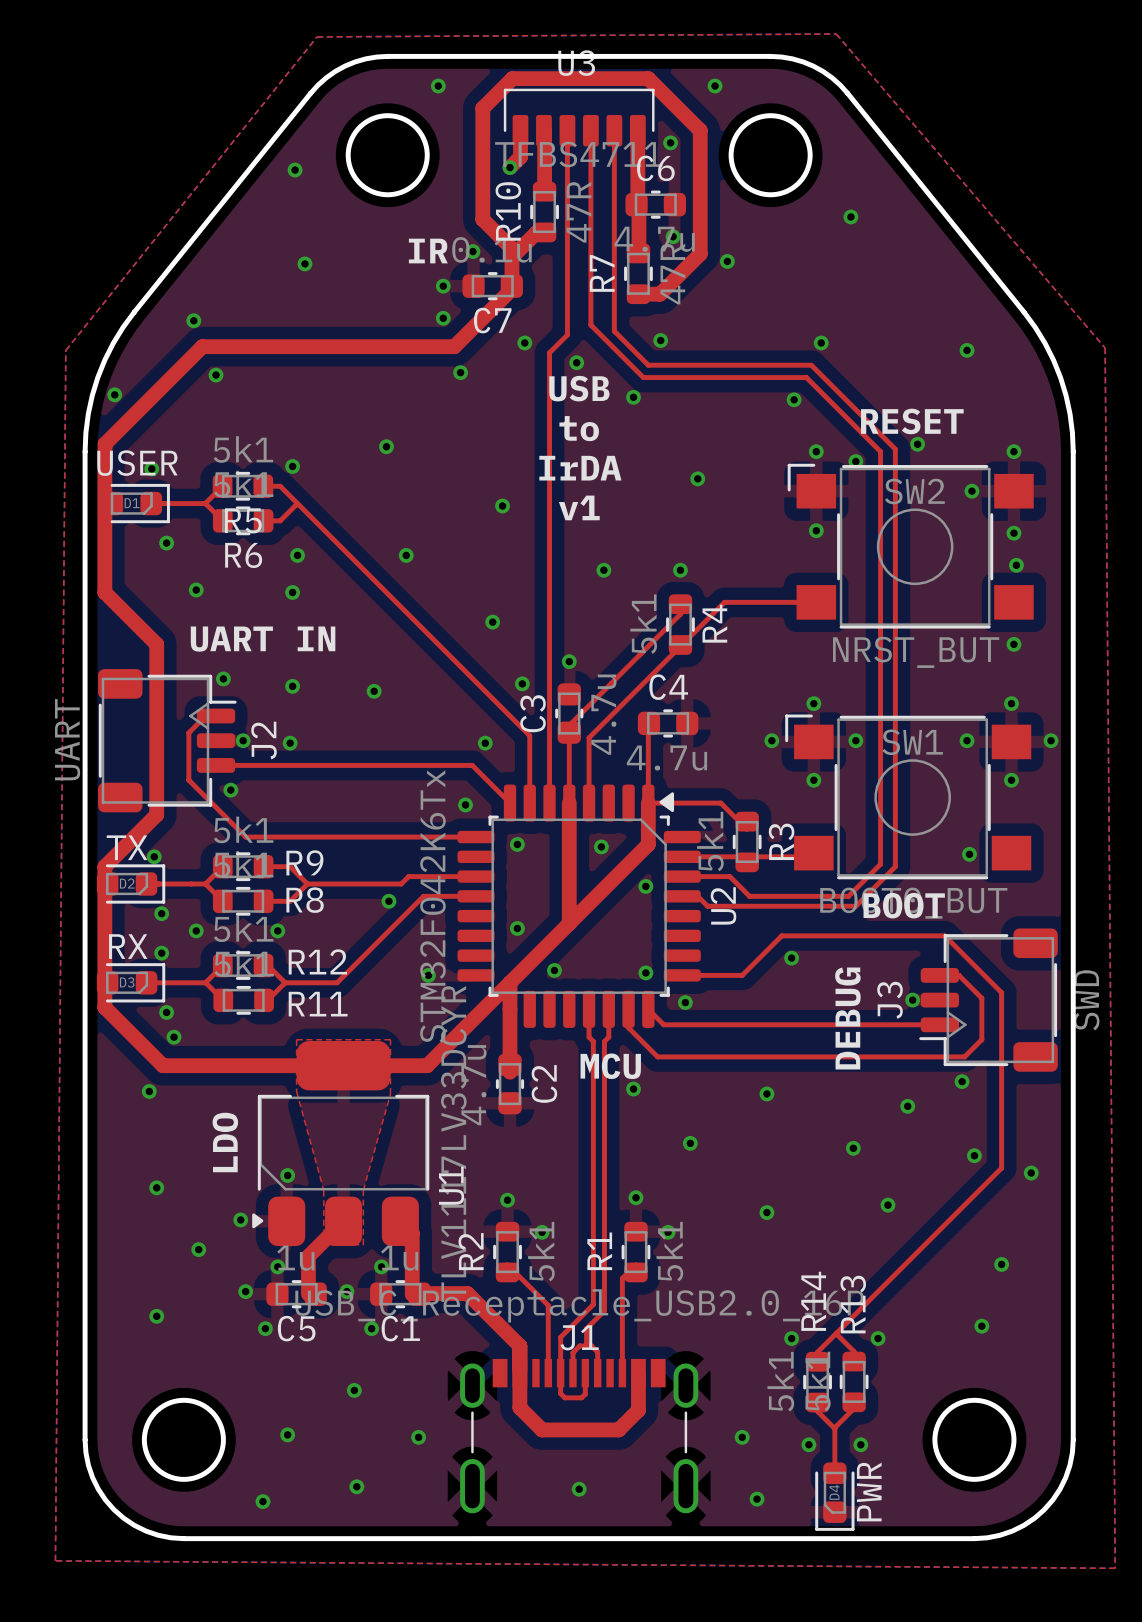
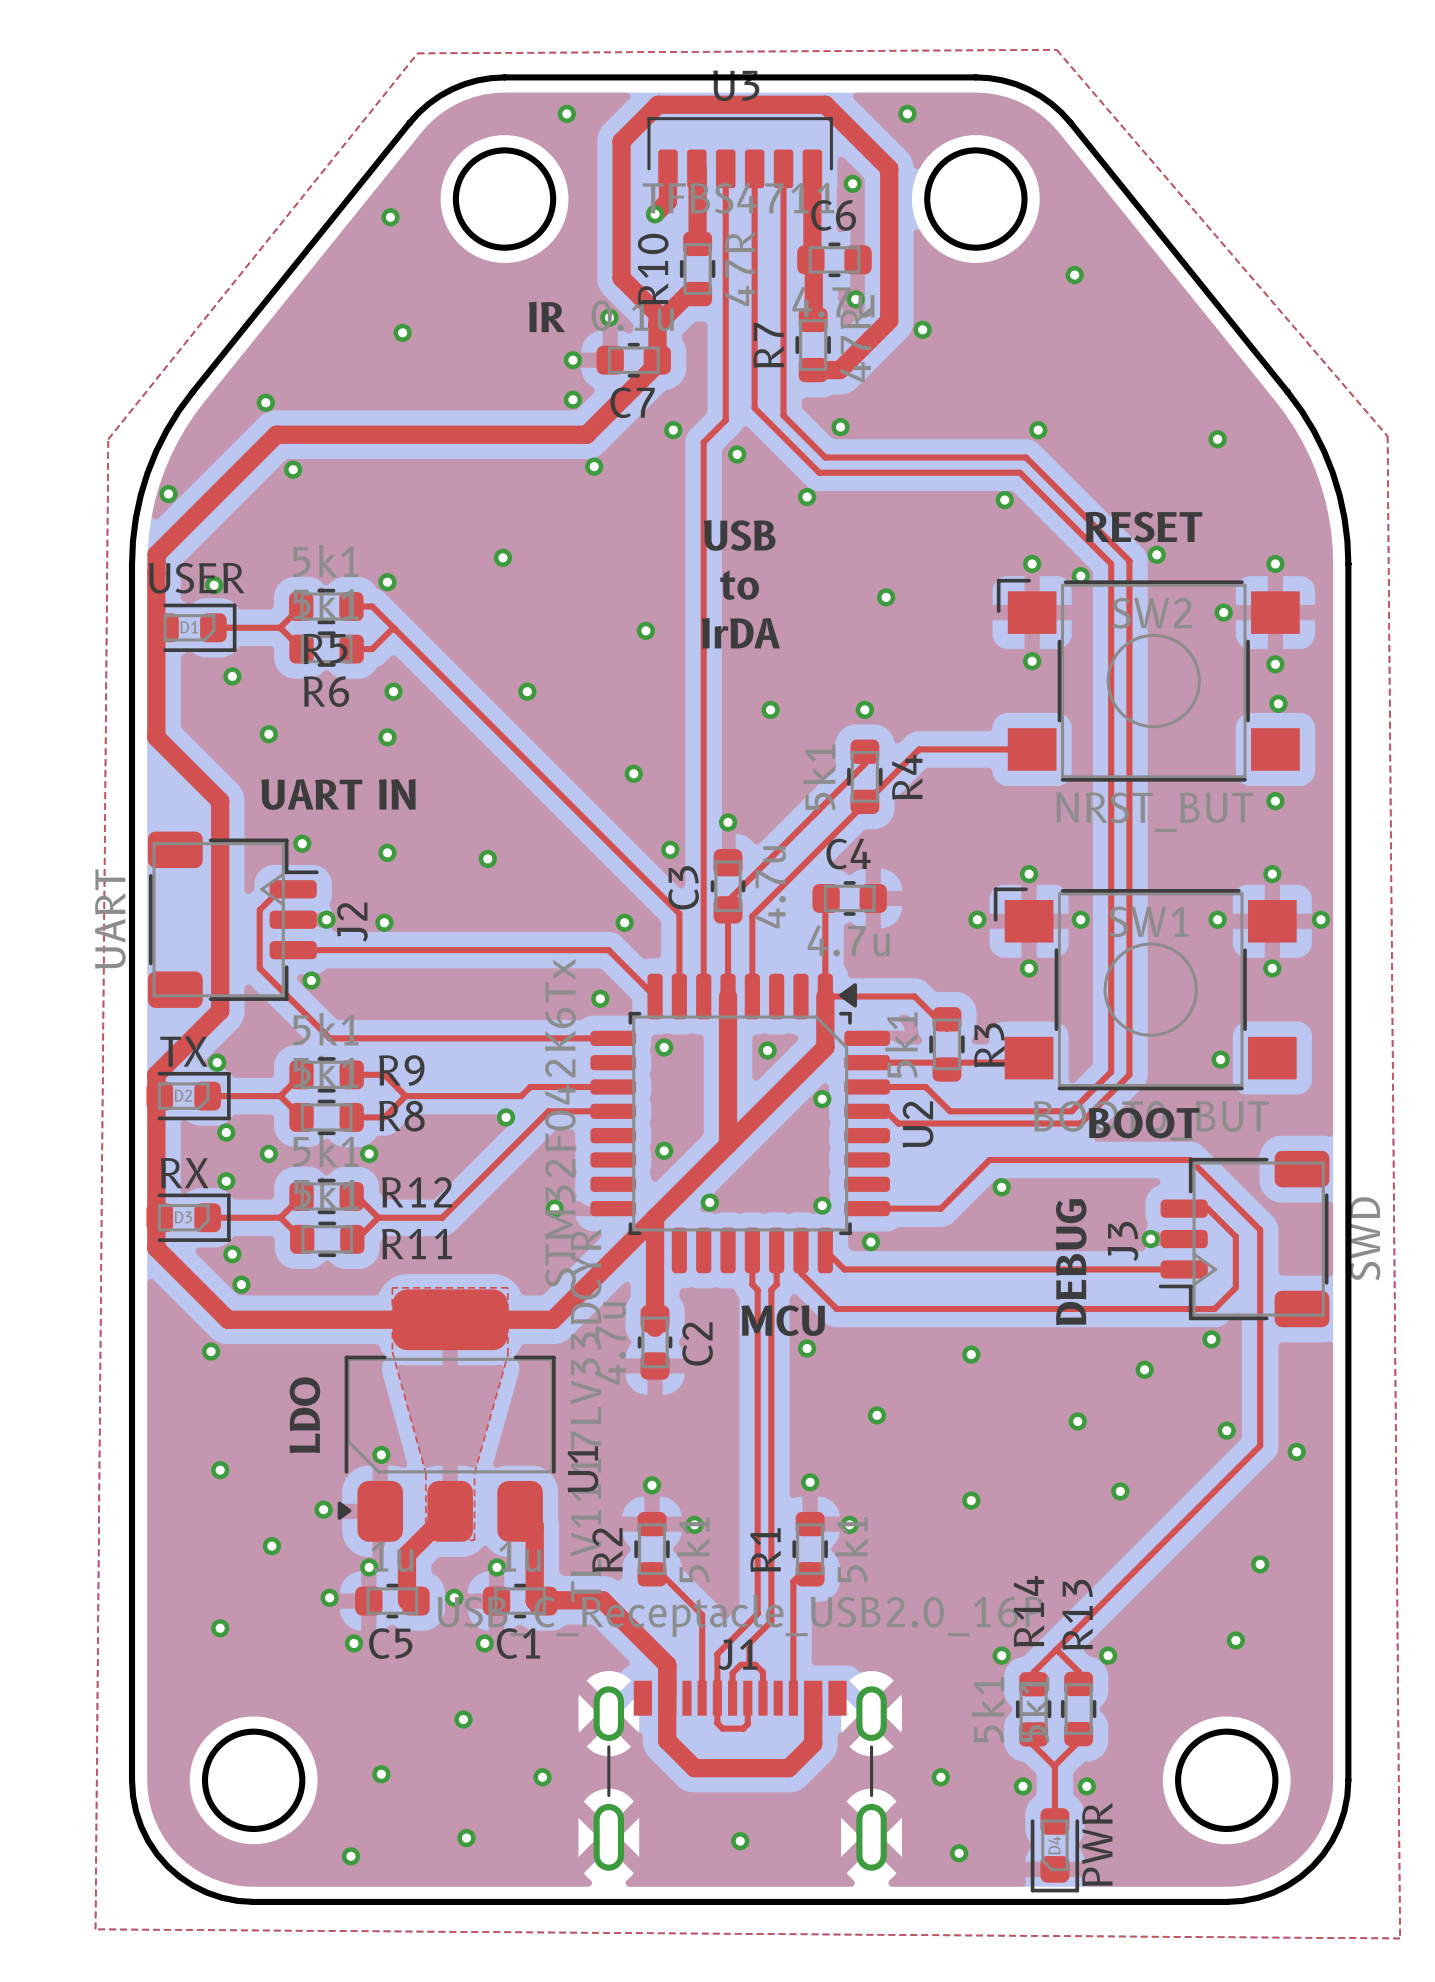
text: USB (579, 388) -> none
text: to (579, 428) -> USB (739, 535)
text: IrDA (580, 468) -> to (739, 585)
text: v1 (579, 507) -> IrDA (740, 633)

